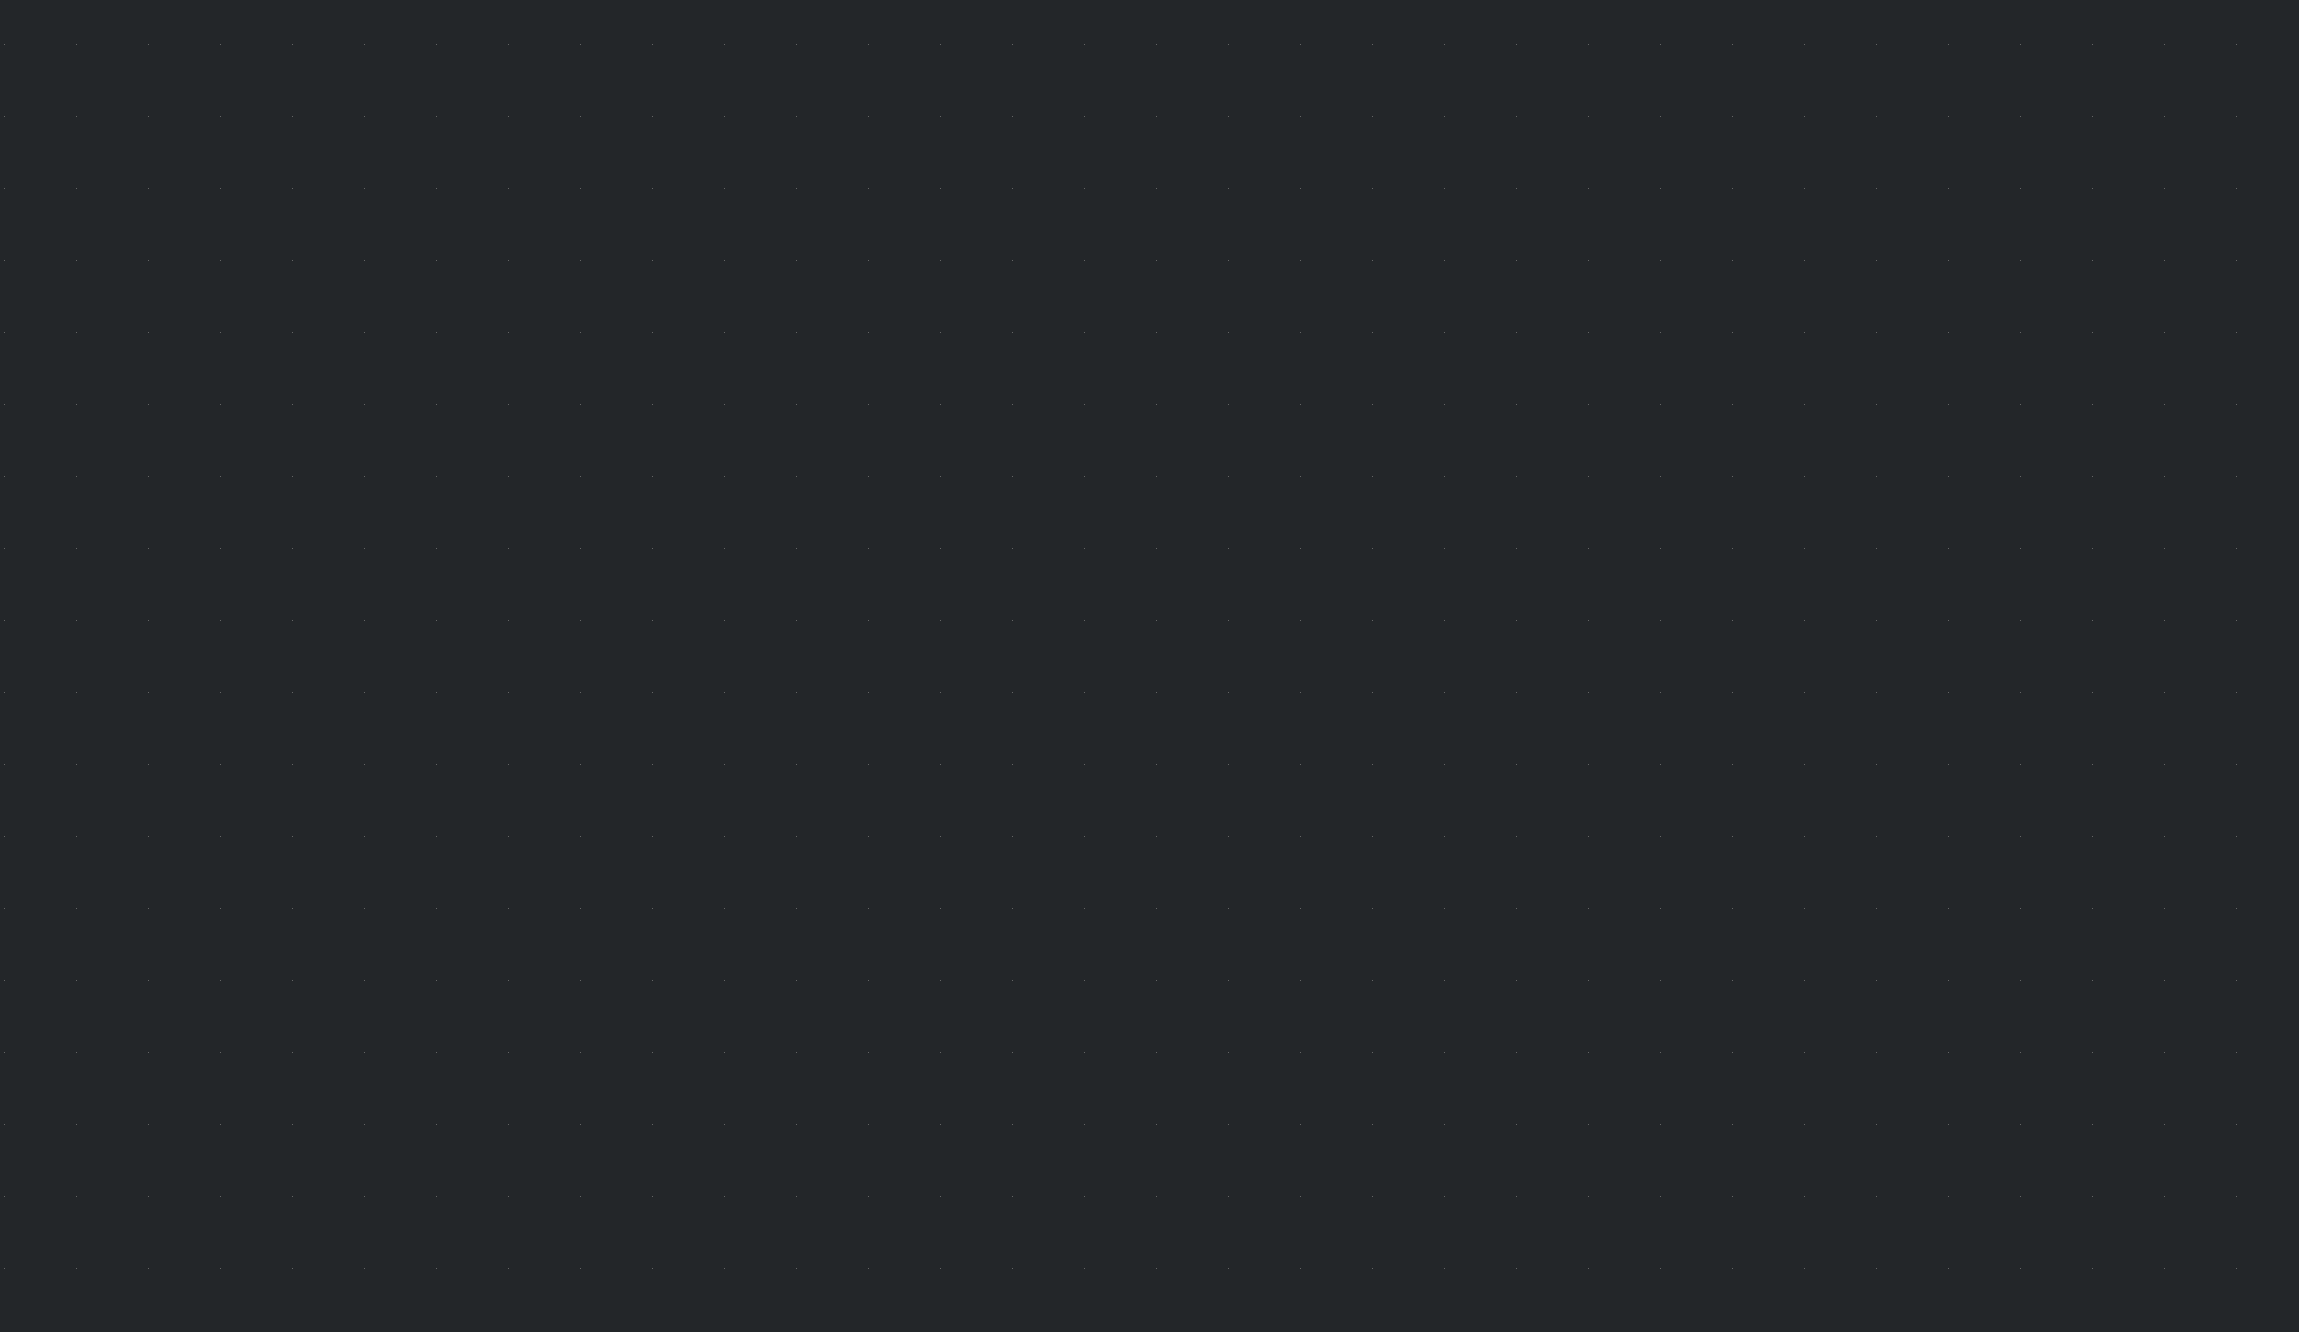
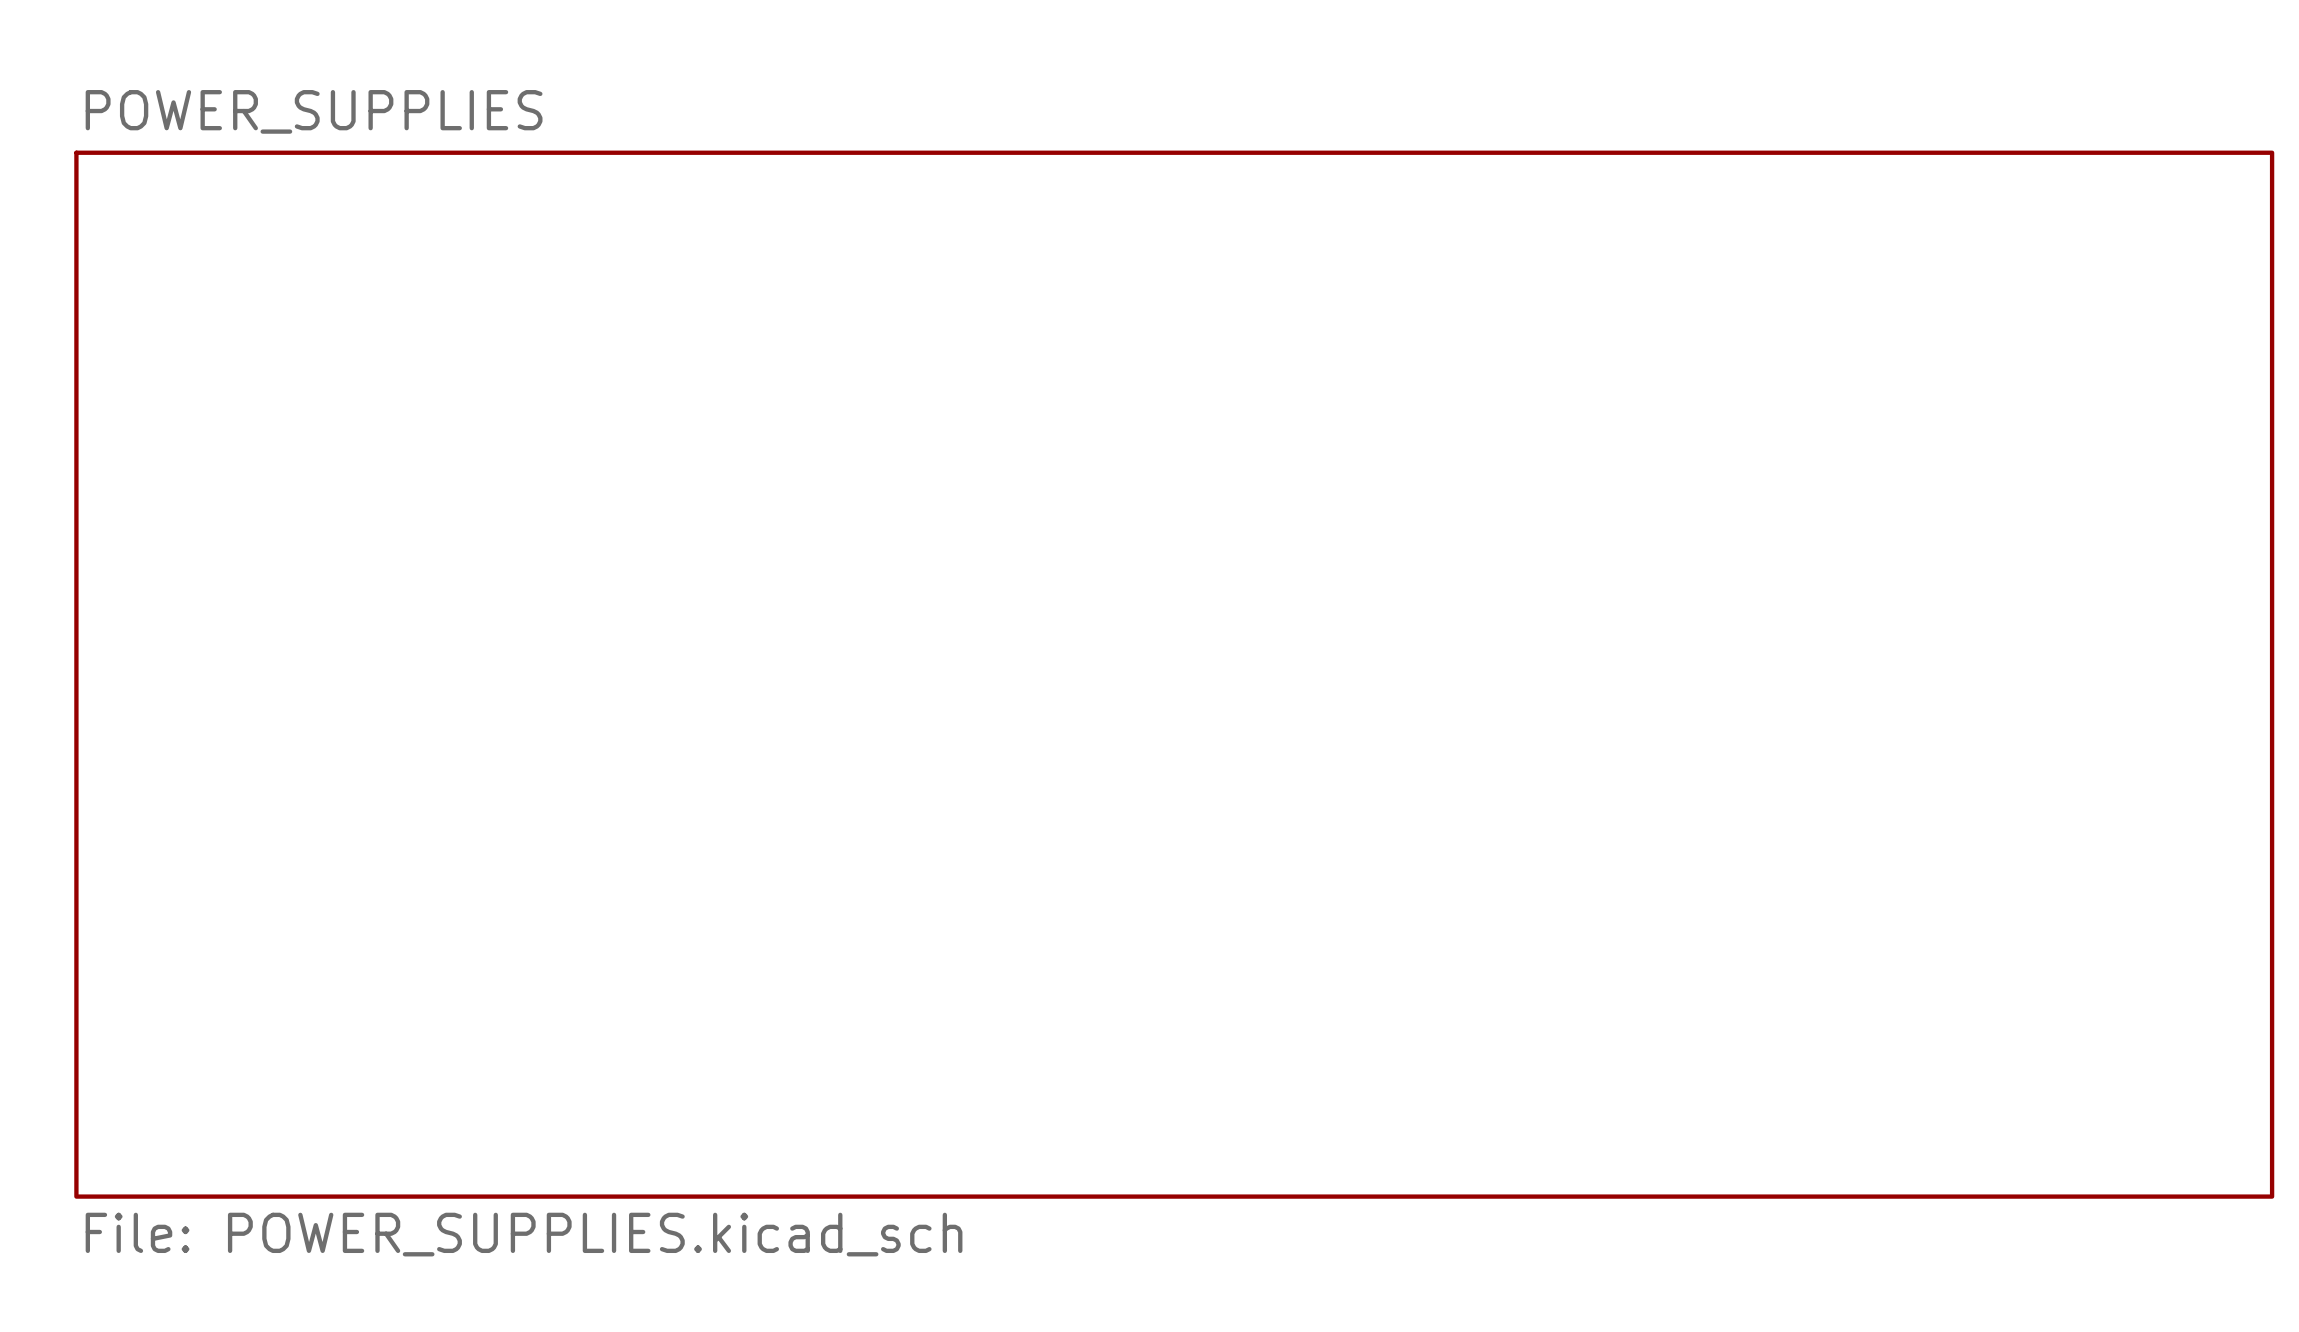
sheet POWER_SUPPLIES: none -> File: POWER_SUPPLIES.kicad_sch (1174, 674)

